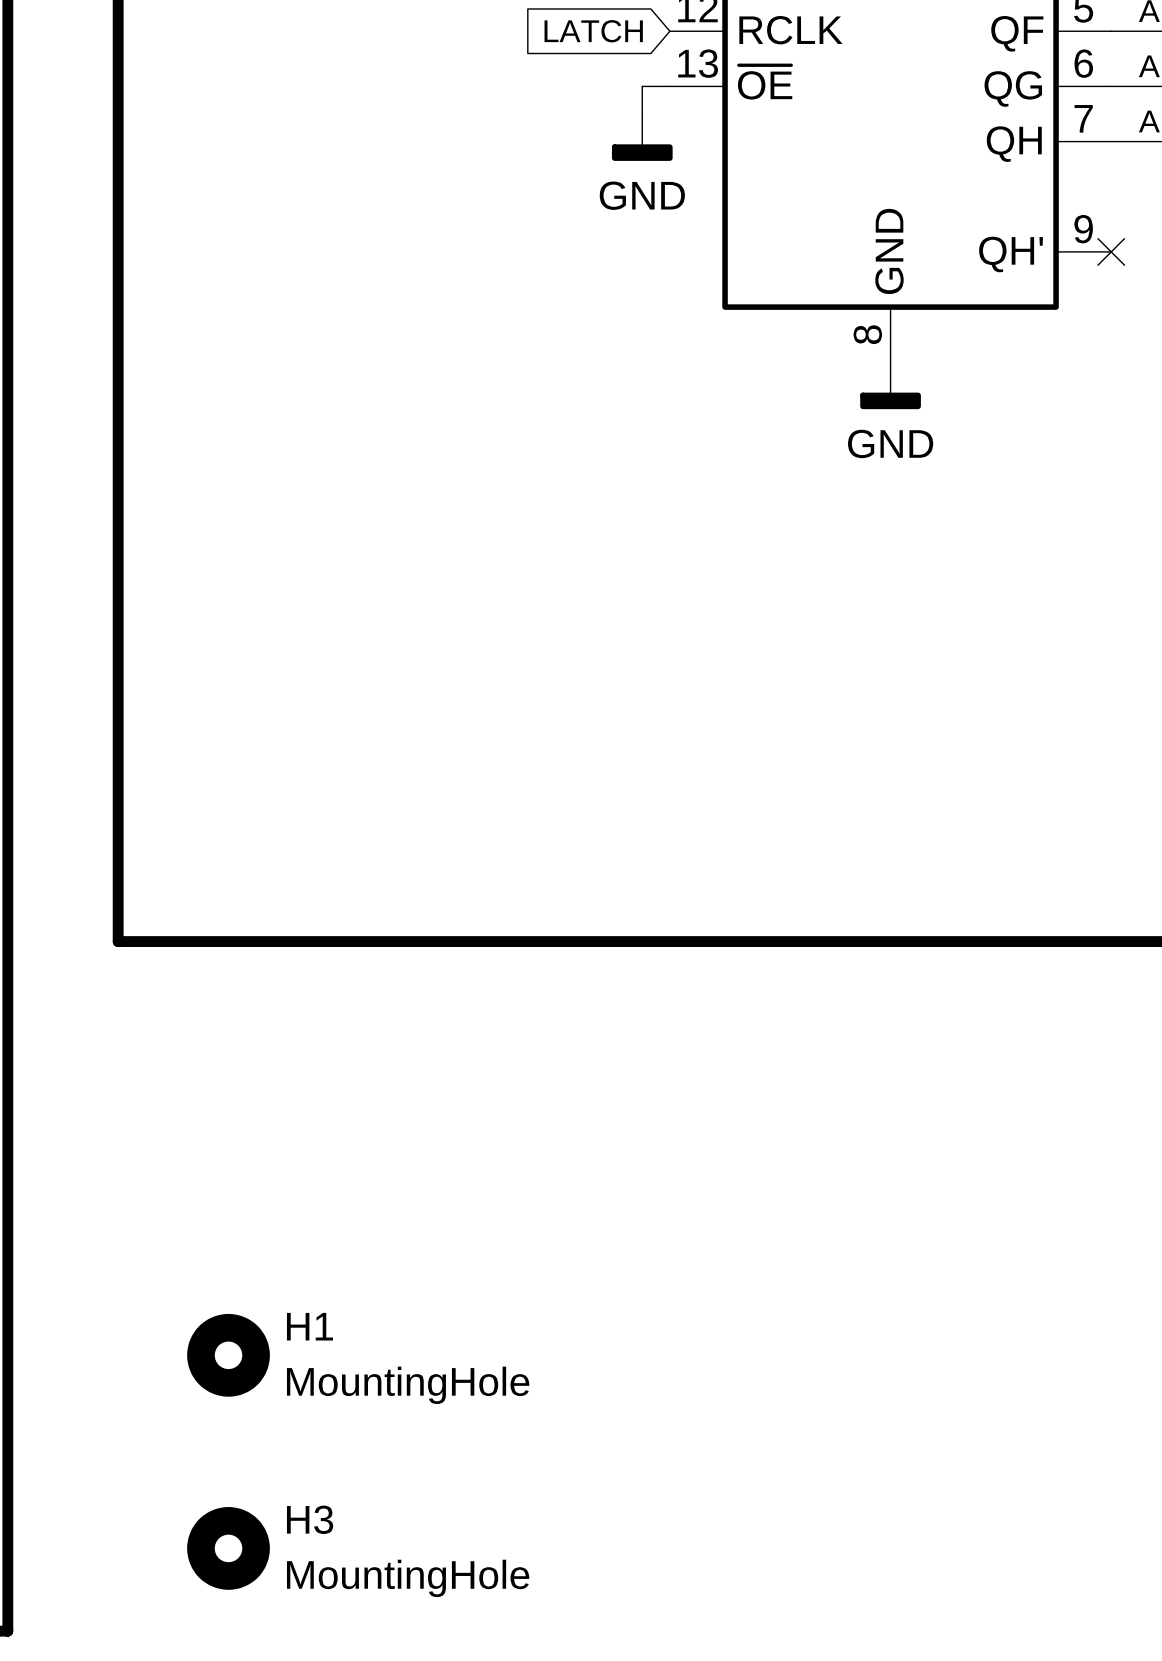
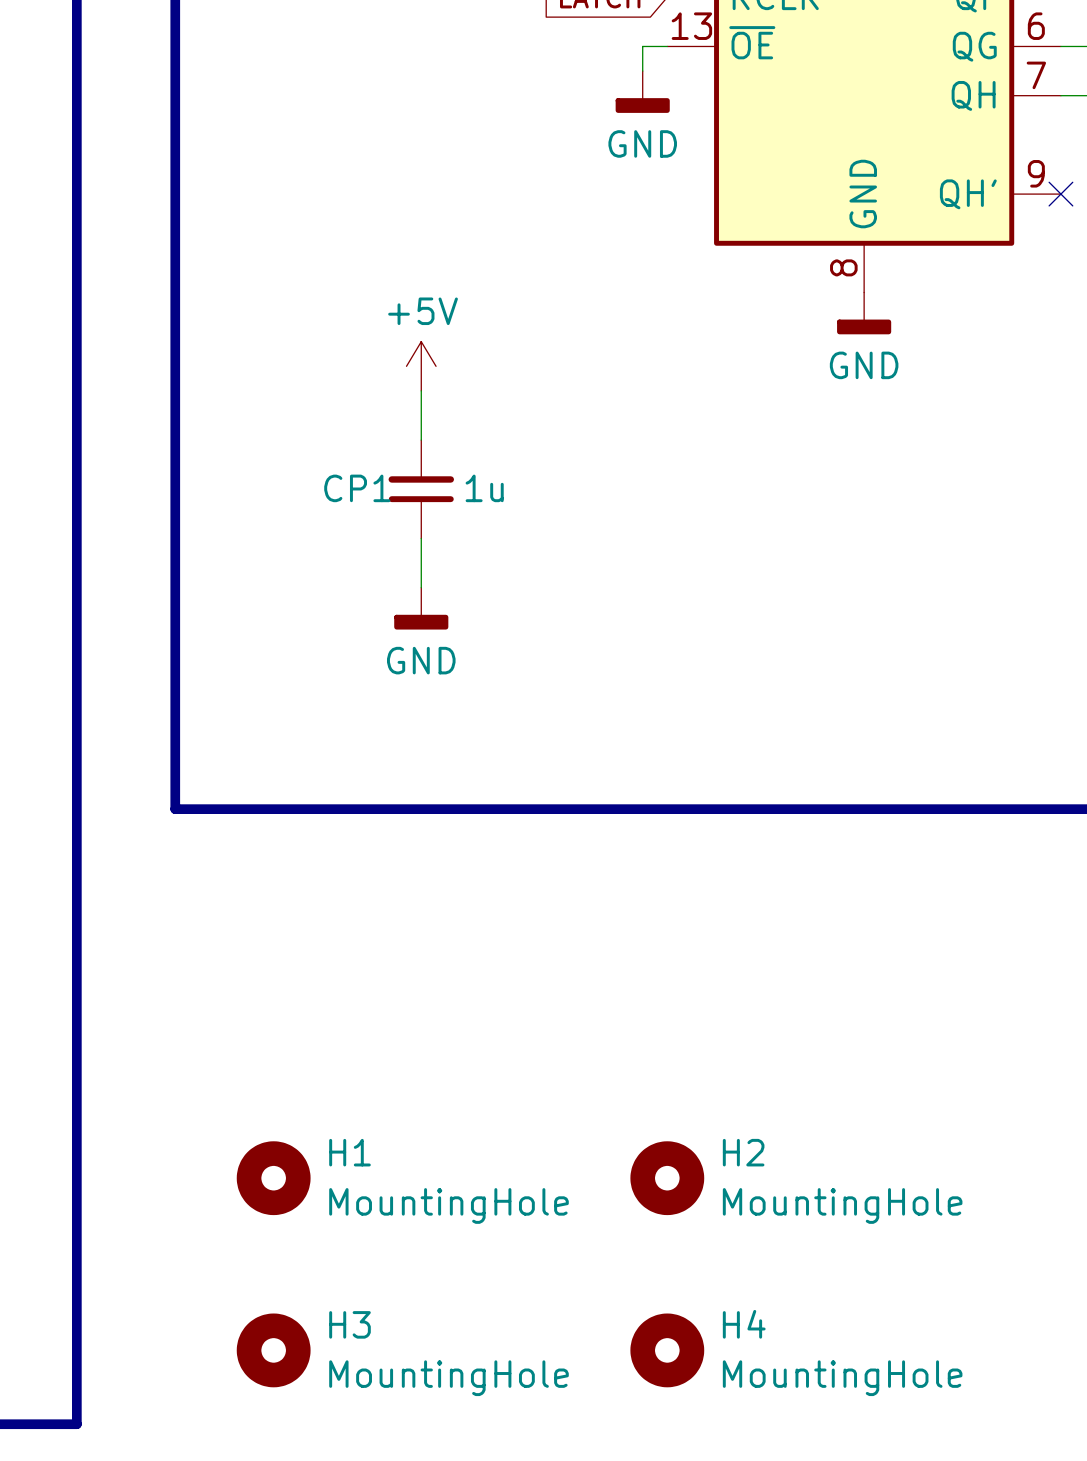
power symbol: none -> +5V (421, 366)
wire: none -> (421, 390) (421, 440)
CP1: none -> 1u (421, 489)
wire: none -> (421, 538) (421, 587)
power symbol: none -> GND (421, 608)
H2: none -> MountingHole (667, 1178)
H4: none -> MountingHole (667, 1350)

